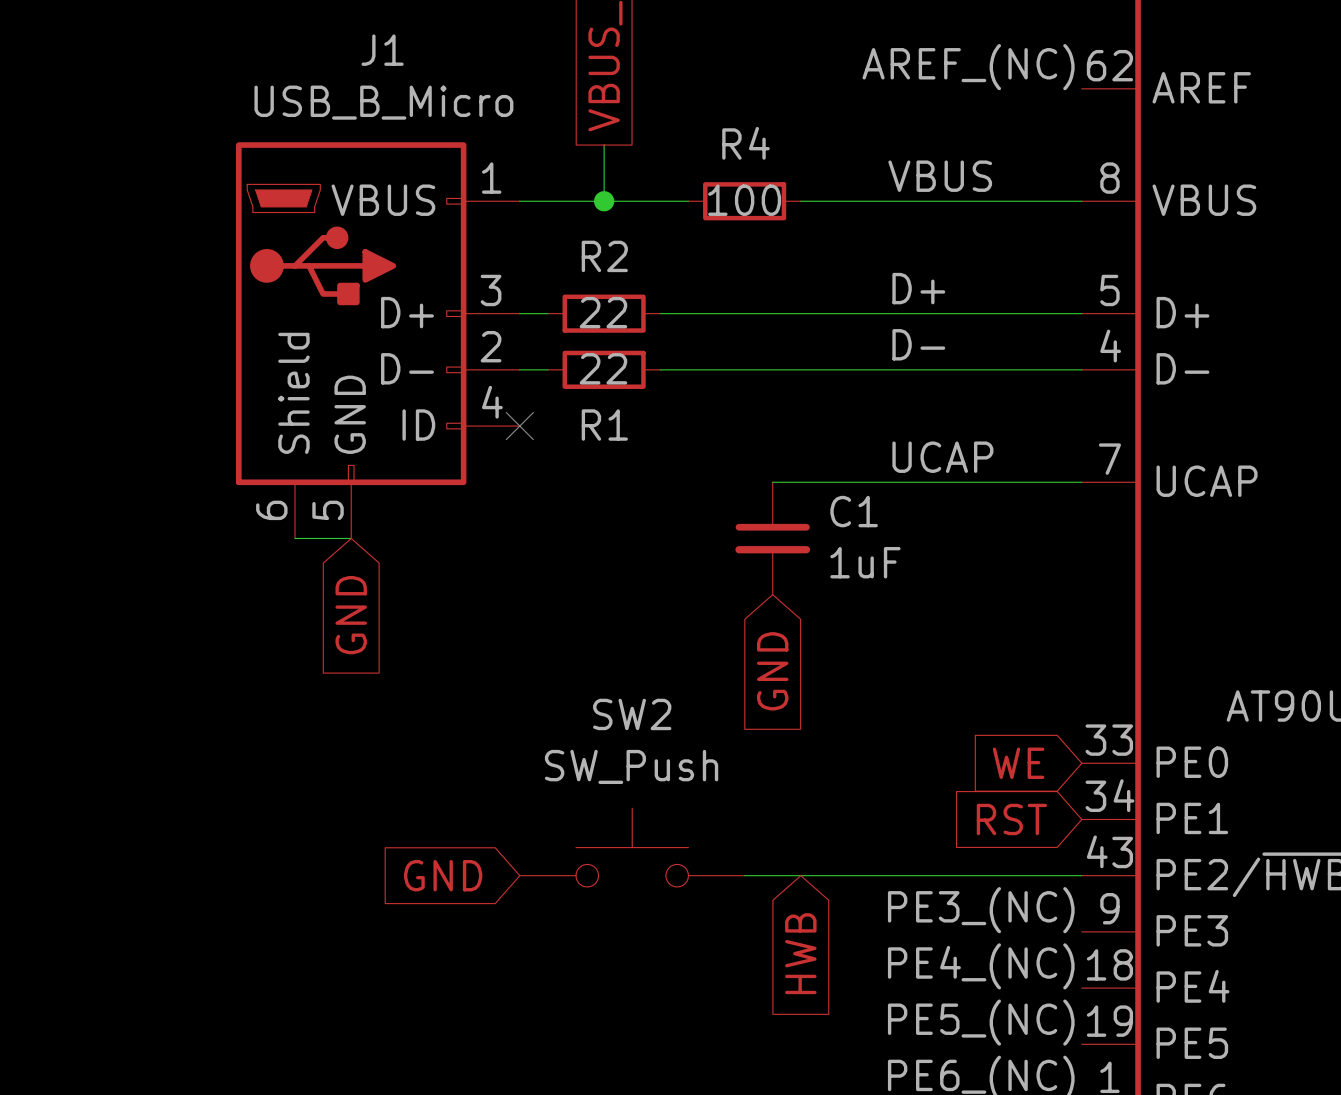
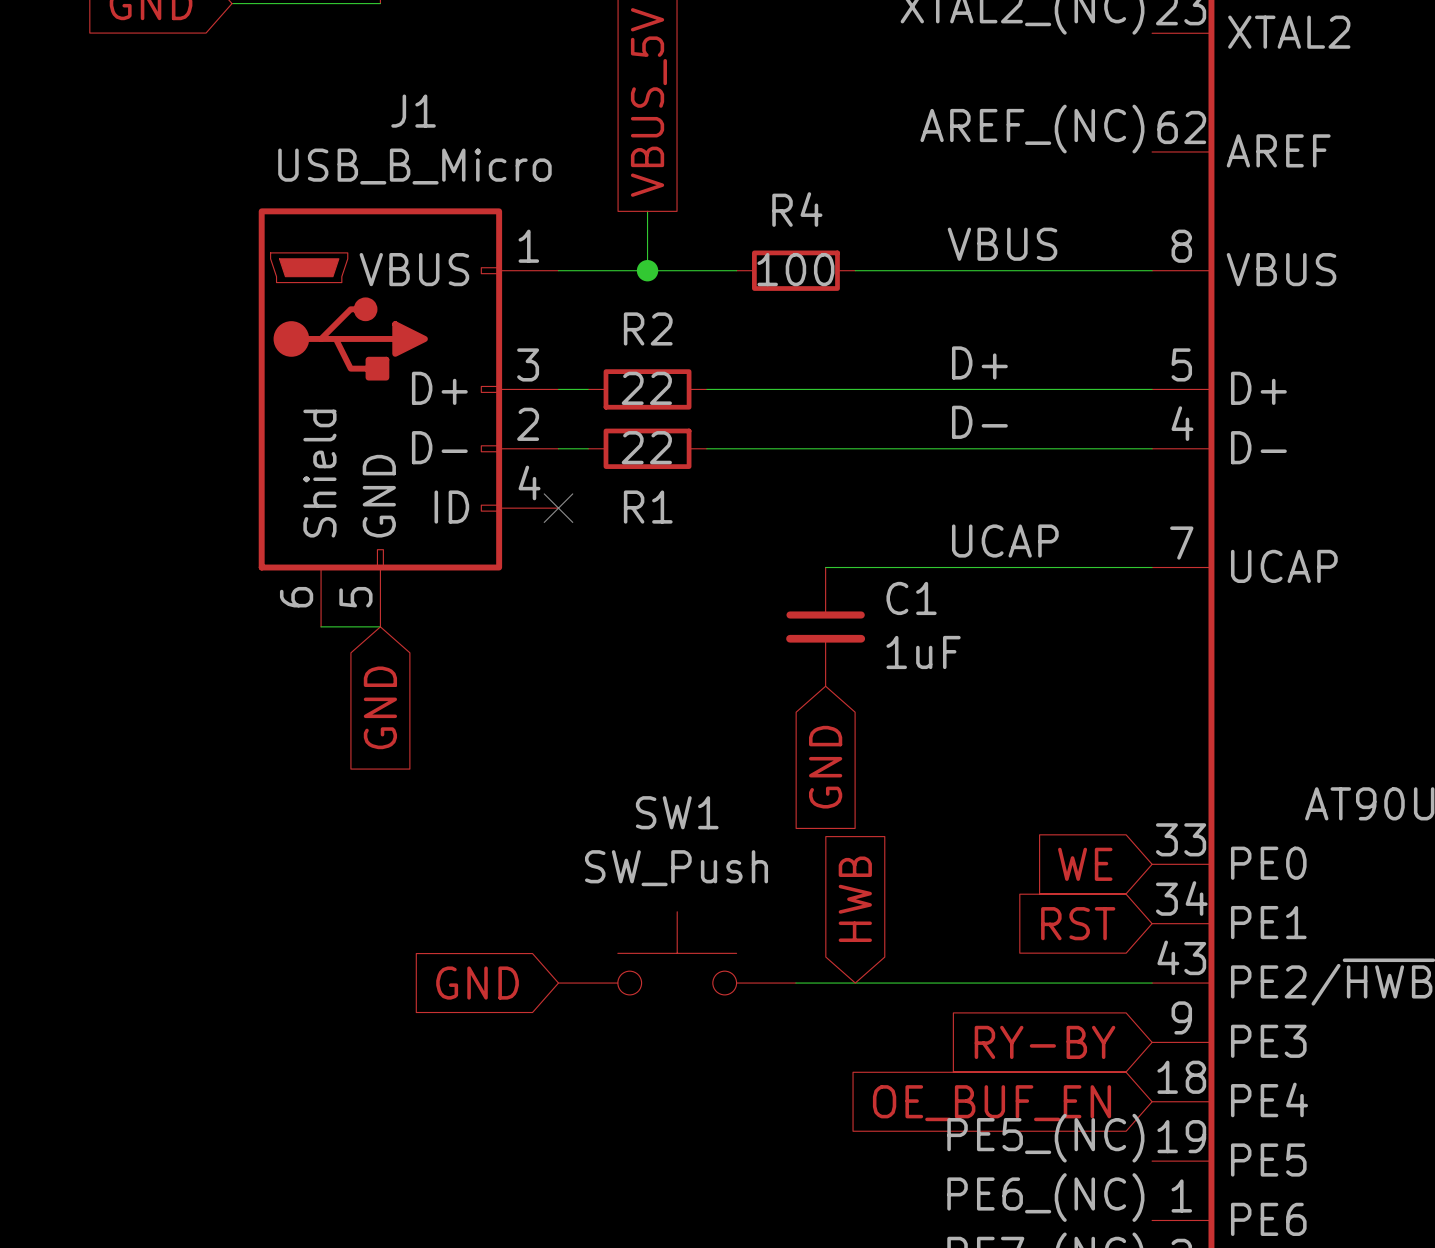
SW2 name: SW2 (632, 714) -> SW1 (677, 812)
label: PE3_(NC) (981, 910) -> none
global label: none -> RY-BY (1044, 1042)
global label rotation: 0° (800, 953) -> 180° (855, 899)
global label position: HWB (800, 953) -> HWB (855, 899)
label: PE4_(NC) (981, 966) -> none
global label: none -> OE_BUF_EN (991, 1103)

